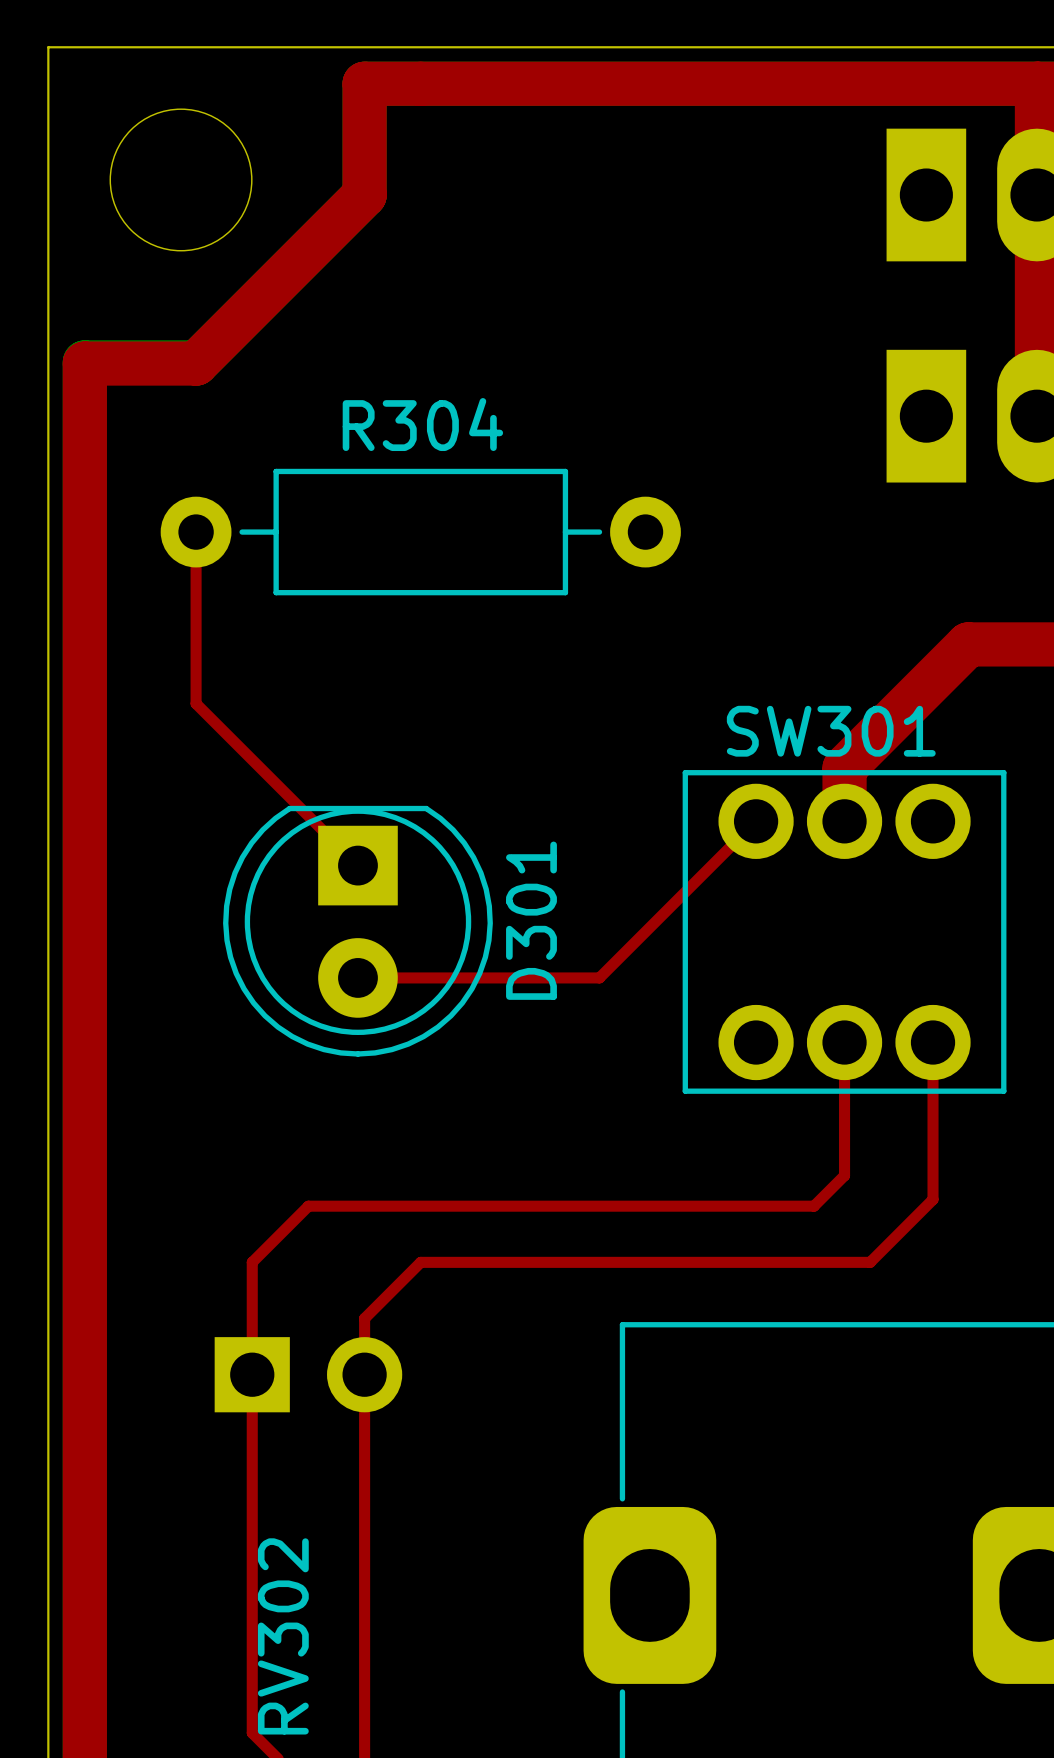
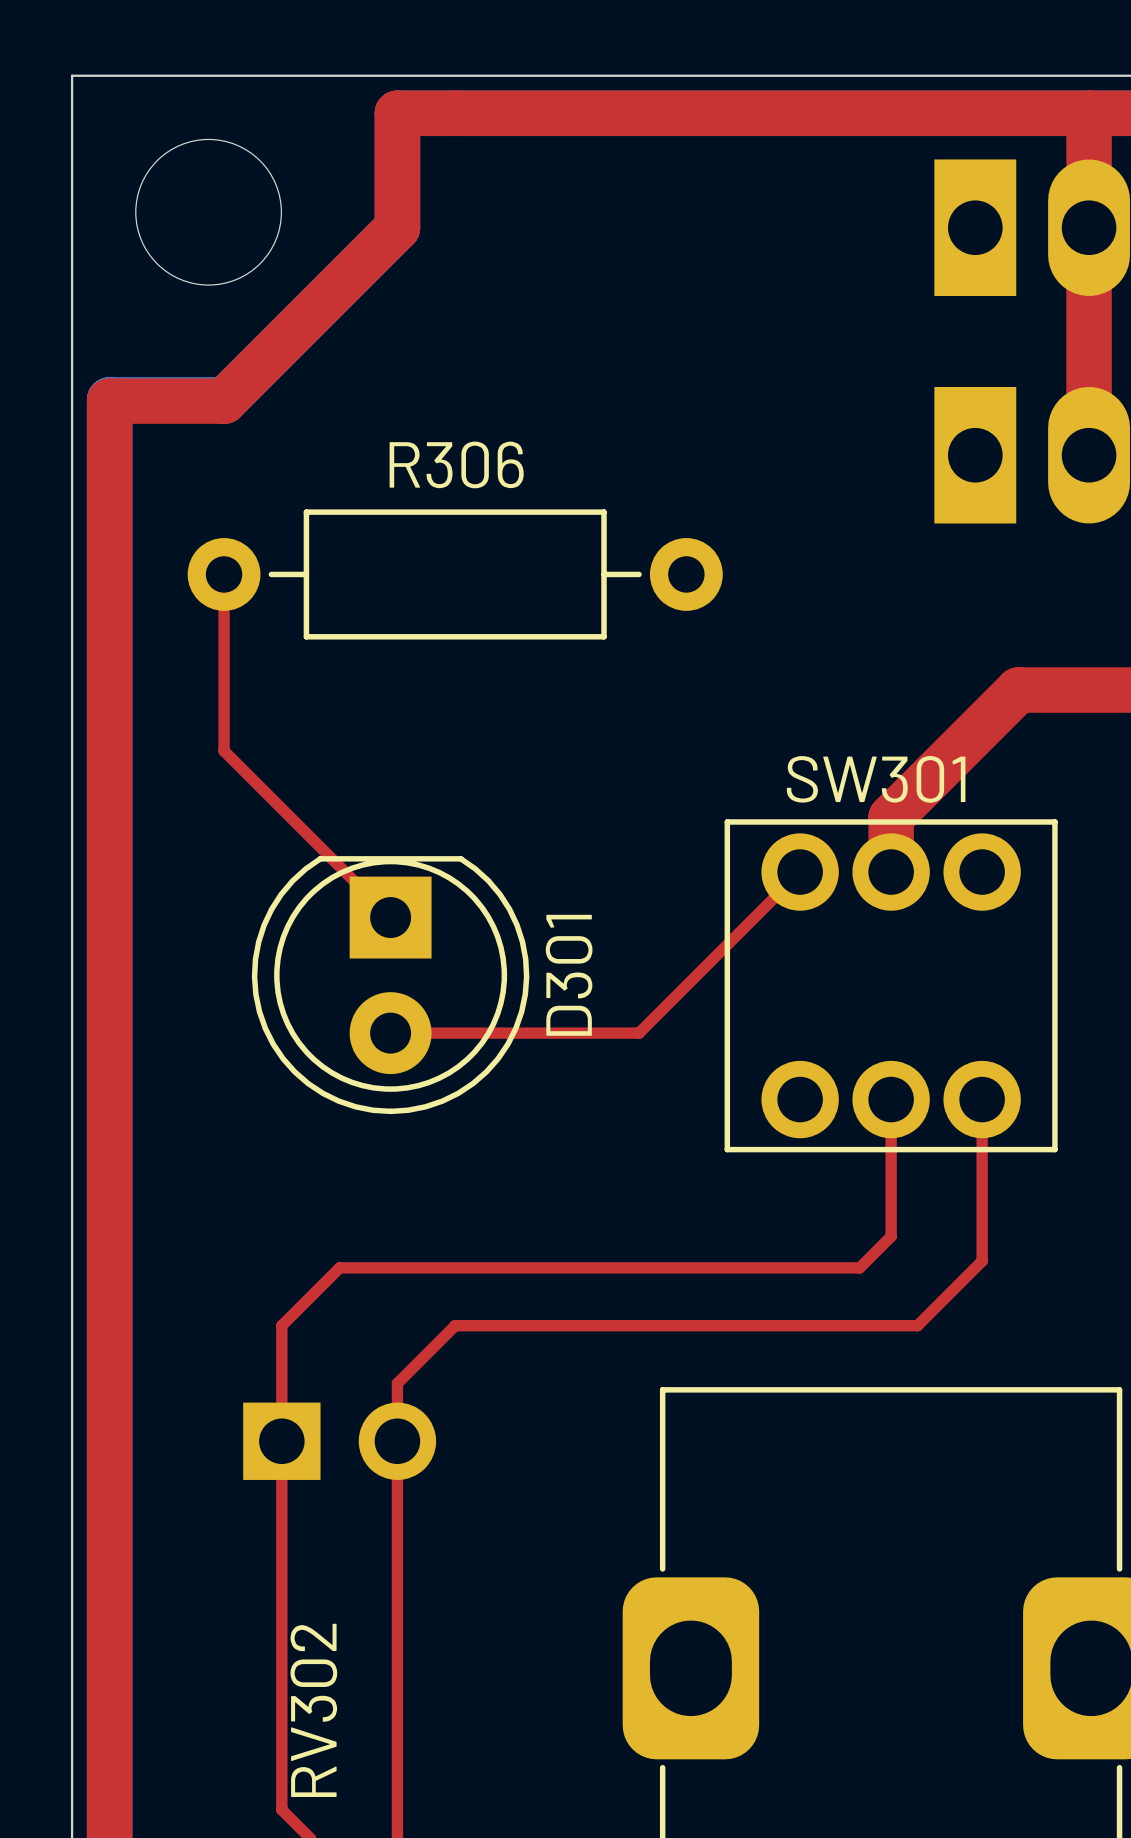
R304 name: R304 (422, 424) -> R306 (456, 464)

